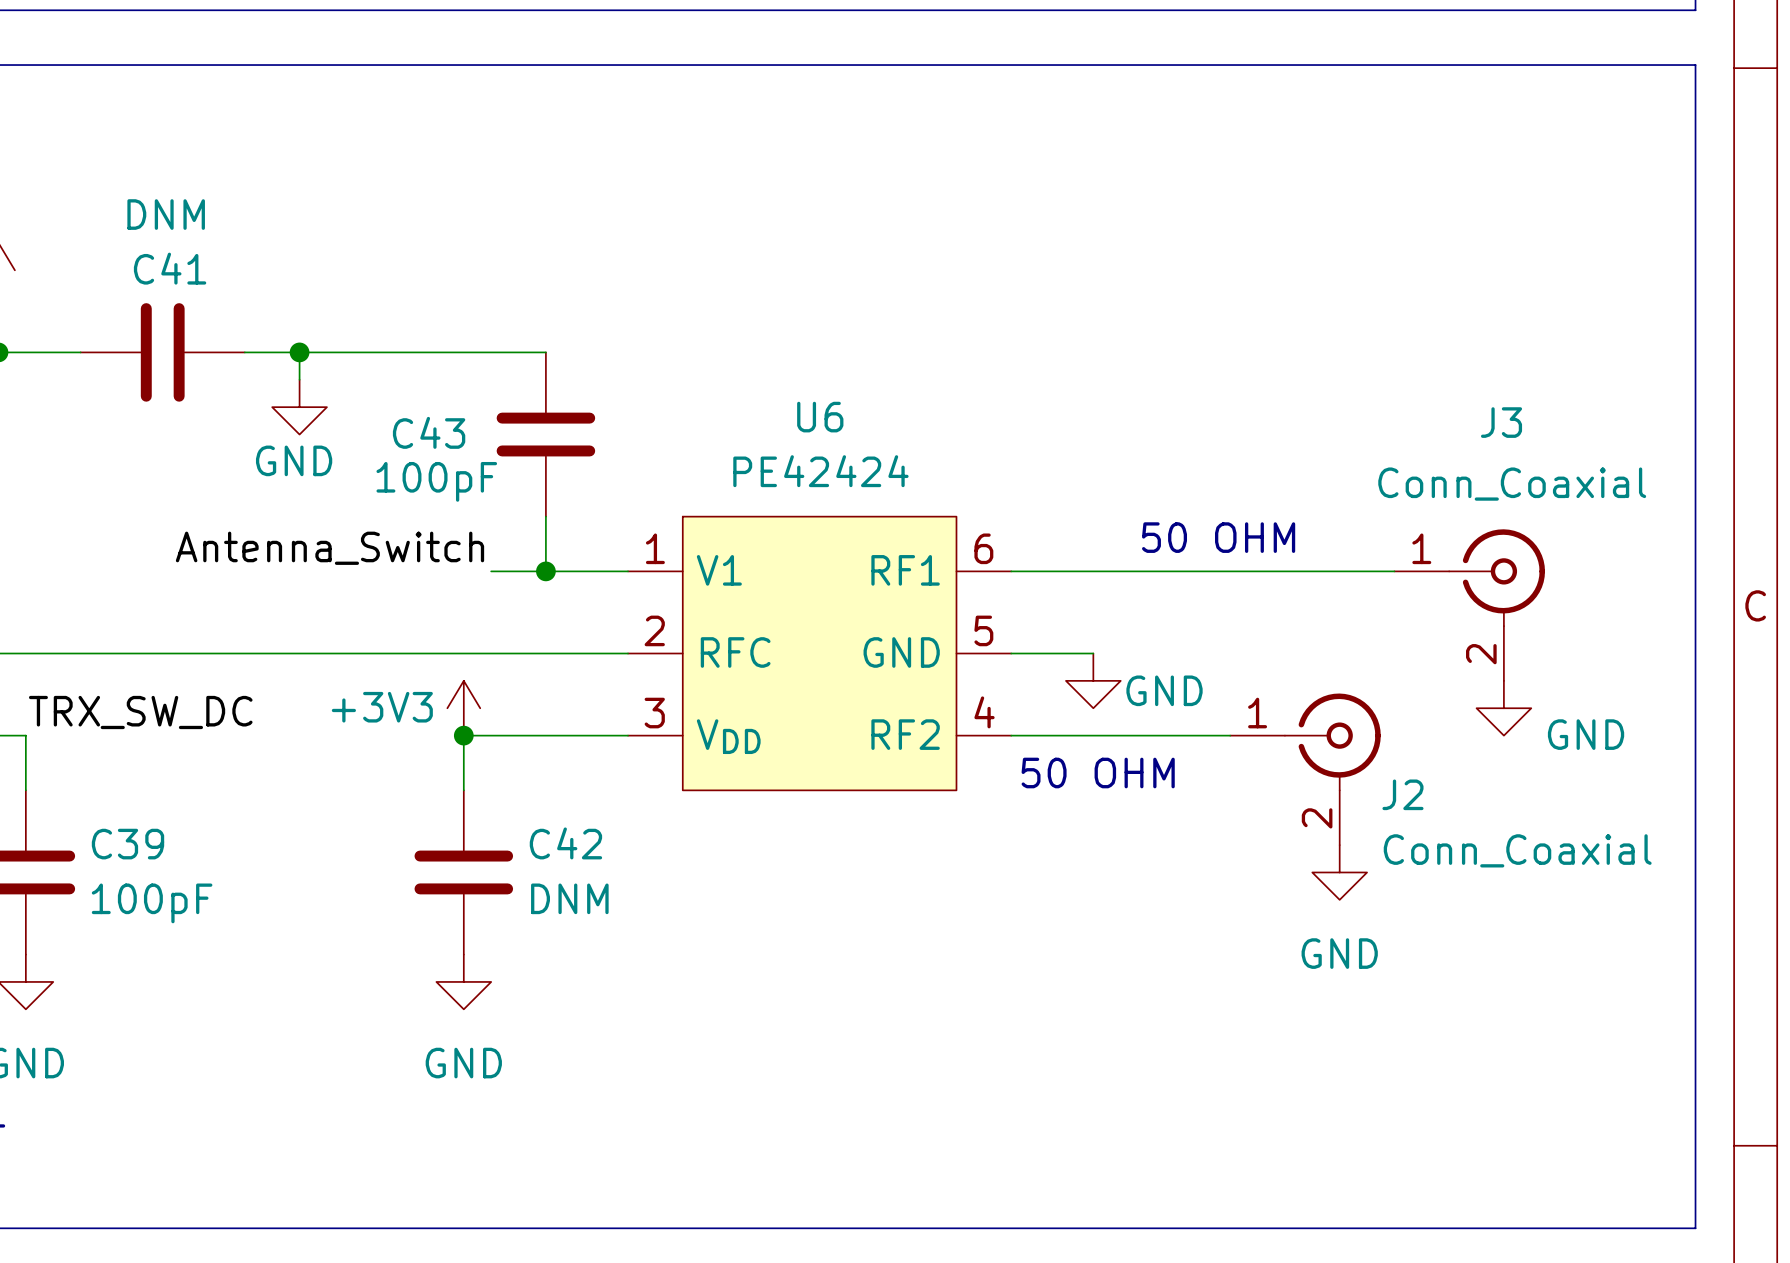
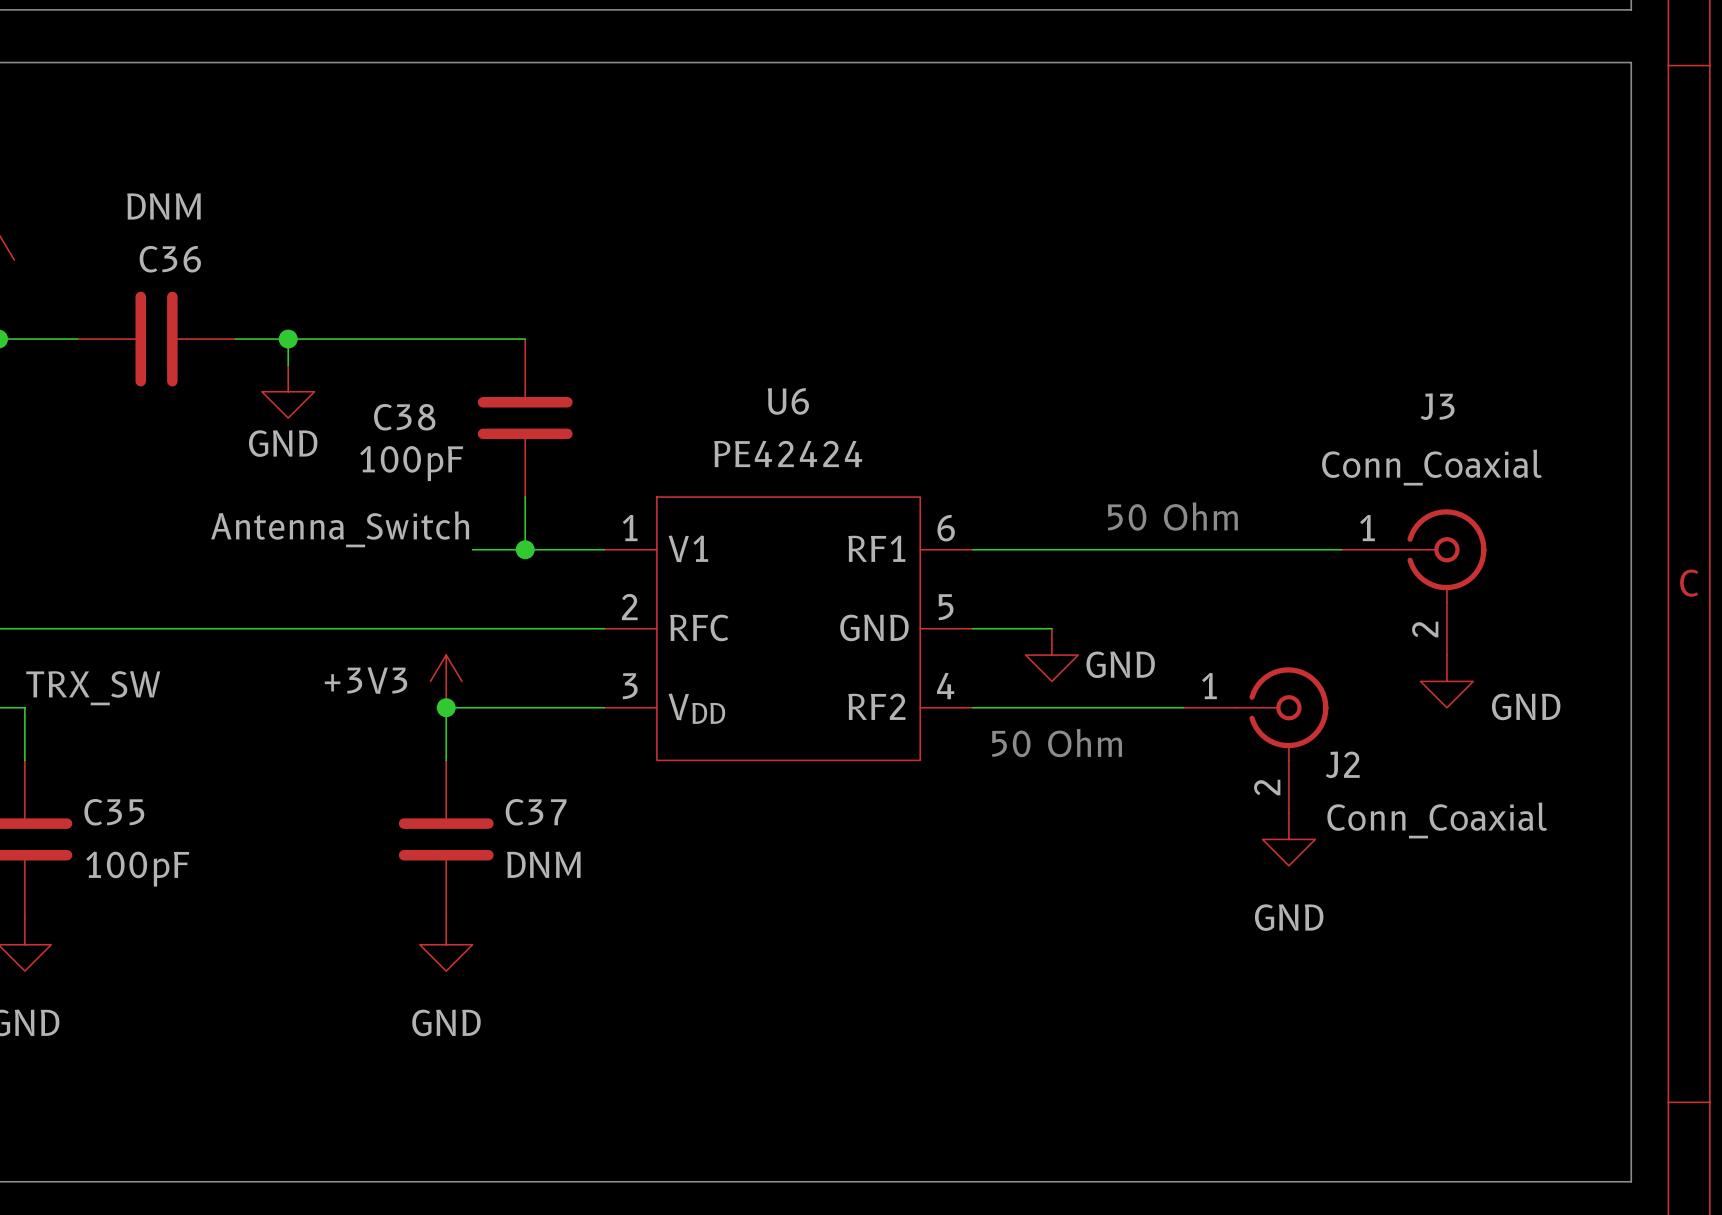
C41 name: C41 (170, 268) -> C36 (170, 259)
C43 name: C43 (429, 432) -> C38 (404, 417)
text: 50 OHM (1218, 537) -> 50 Ohm (1172, 516)
label: TRX_SW_DC (140, 712) -> TRX_SW (93, 688)
text: 50 OHM (1098, 773) -> 50 Ohm (1057, 742)
C42 name: C42 (565, 843) -> C37 (536, 812)
C39 name: C39 (127, 844) -> C35 (114, 812)

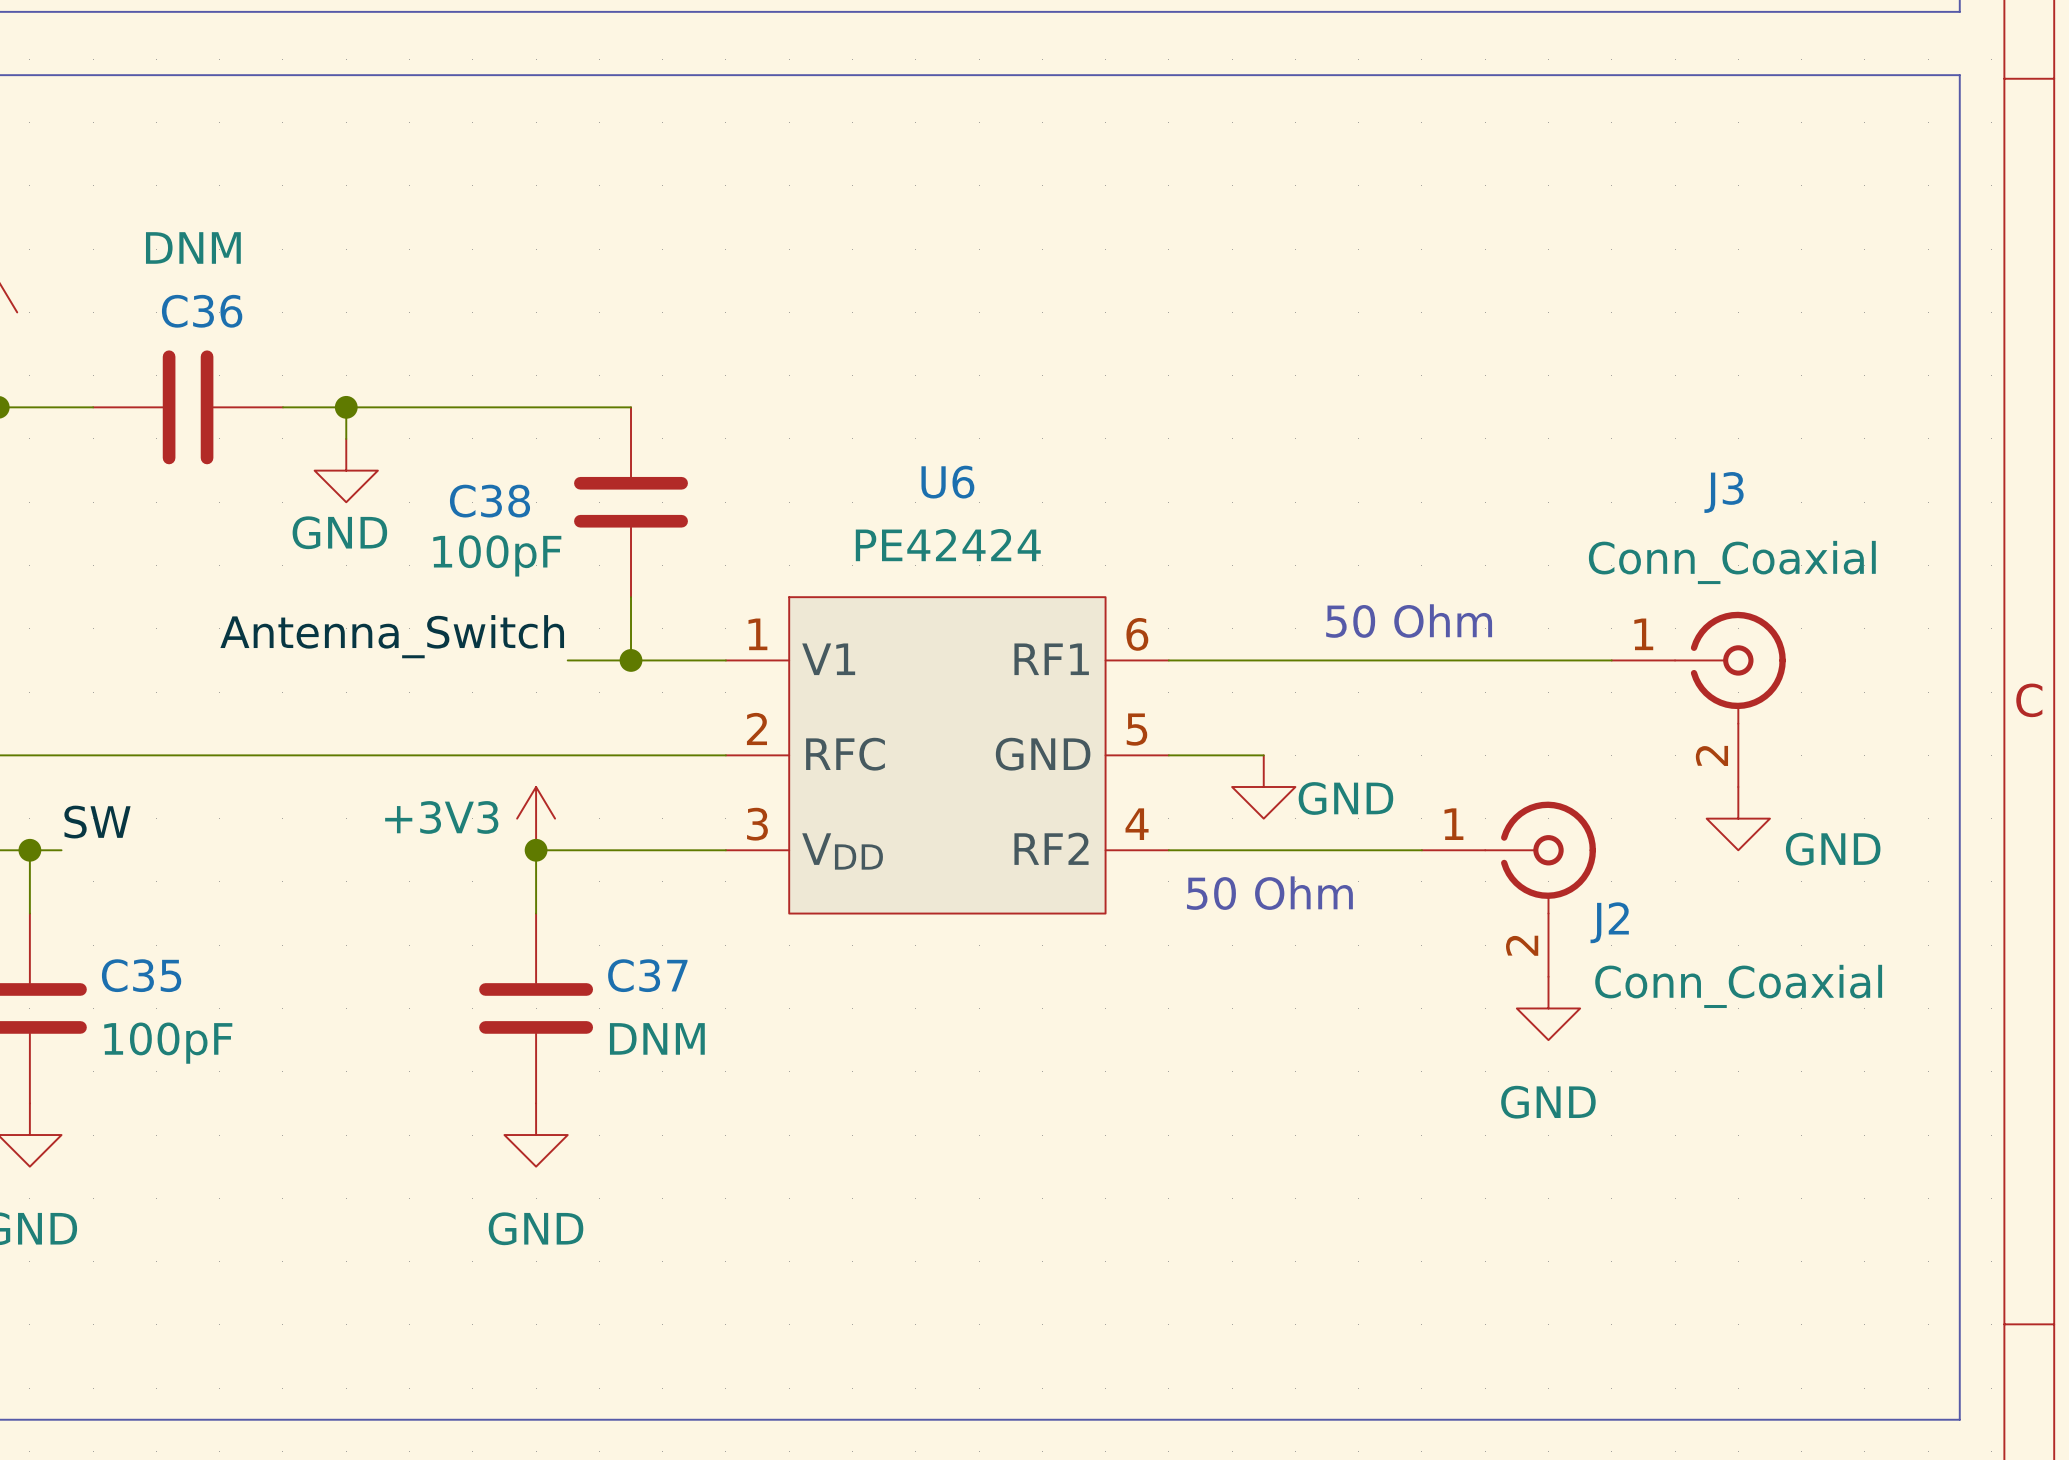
label: none -> SW (97, 822)
label: TRX_SW (93, 688) -> none
wire: none -> (29, 850) (61, 850)
junction: none -> (29, 850)

